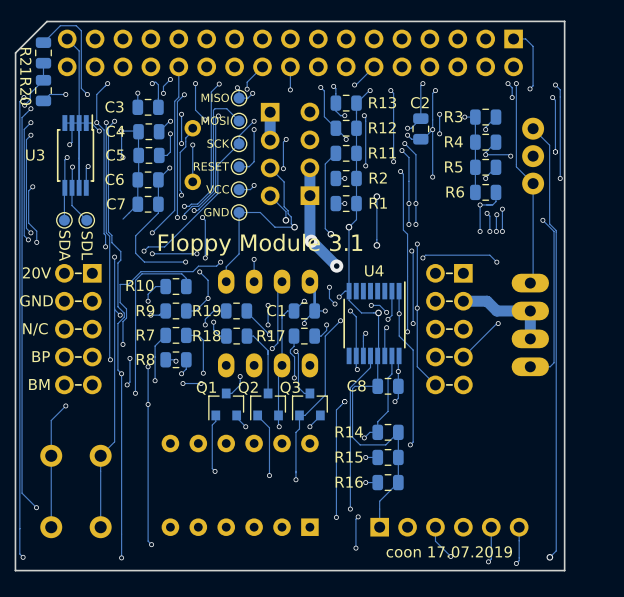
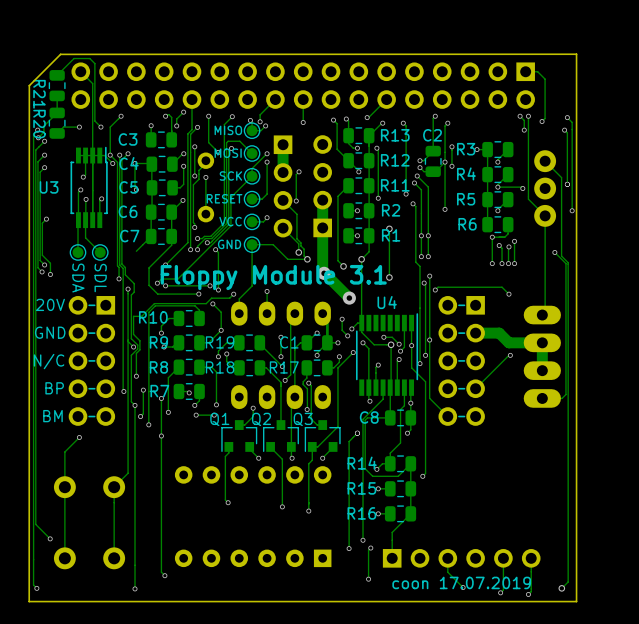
R7 name: R7 (145, 334) -> R8 (158, 367)
R8 name: R8 (145, 359) -> R7 (159, 391)

